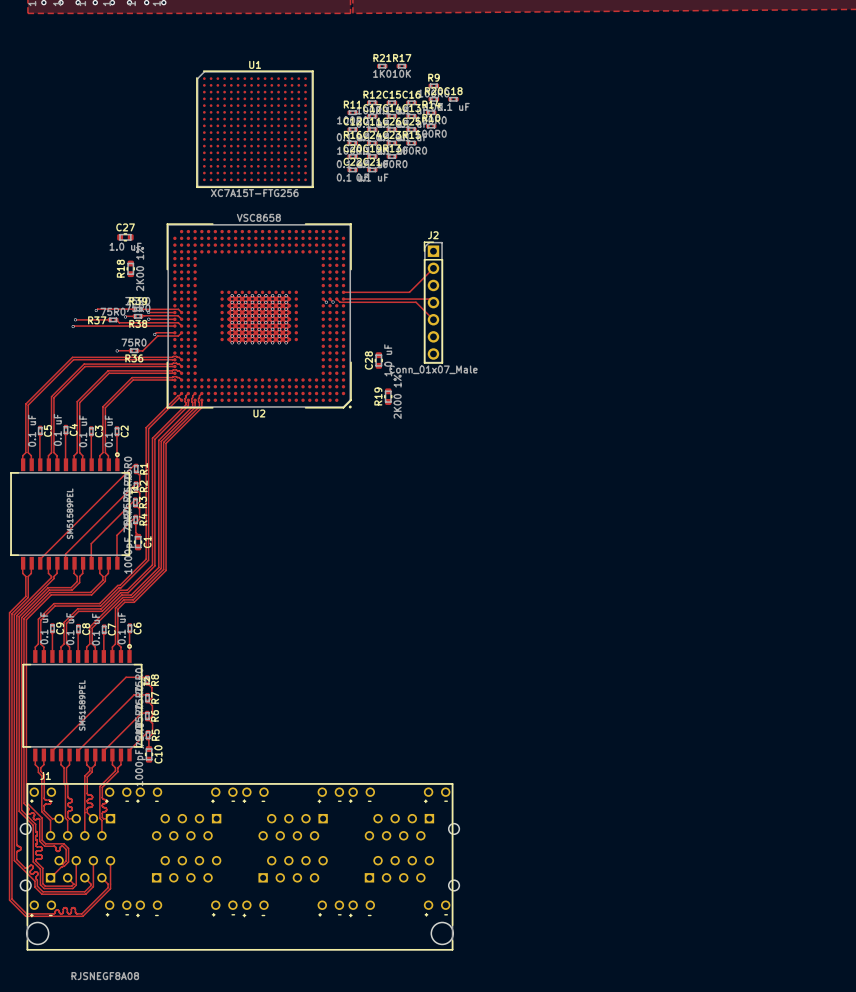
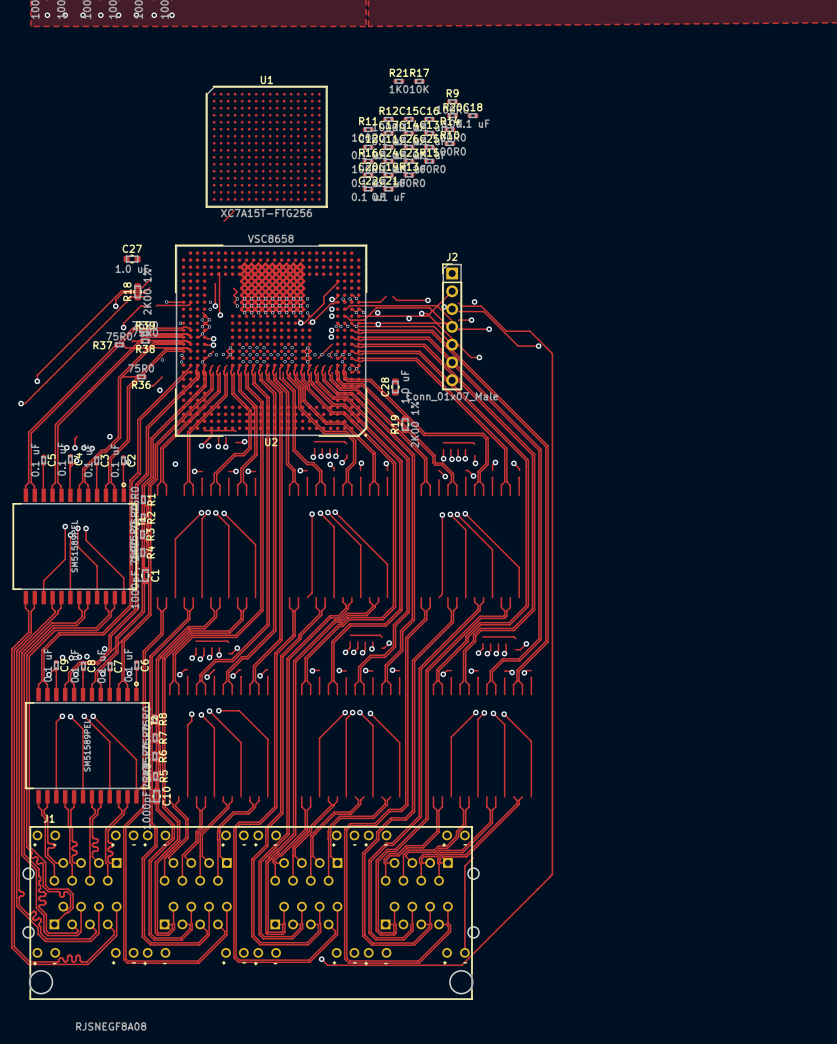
track: none -> (234, 211) (223, 221)
track: none -> (279, 263) (241, 302) (251, 312) (300, 263) (304, 267)
track: none -> (219, 272) (220, 315)
track: none -> (149, 280) (139, 290) (121, 290) (37, 375) (37, 381)
track: none -> (339, 281) (323, 296) (323, 303) (304, 322) (300, 322)
track: none -> (215, 283) (215, 306)
track: none -> (149, 287) (144, 292) (122, 292) (115, 299) (115, 306)
track: none -> (234, 288) (237, 291) (234, 295) (237, 298) (234, 302)
track: none -> (339, 295) (335, 299) (332, 299)
track: none -> (353, 295) (356, 298)
track: none -> (149, 296) (131, 296) (25, 403) (21, 403)
track: none -> (386, 296) (380, 302) (360, 302)
track: none -> (392, 296) (396, 300) (427, 300)
via: none -> (237, 298)
via: none -> (244, 298)
via: none -> (251, 298)
via: none -> (258, 298)
via: none -> (265, 298)
via: none -> (272, 298)
via: none -> (279, 298)
via: none -> (286, 298)
via: none -> (293, 298)
via: none -> (300, 298)
via: none -> (307, 298)
track: none -> (343, 299) (346, 302)
via: none -> (343, 299)
track: none -> (349, 298) (353, 302)
via: none -> (349, 298)
via: none -> (356, 298)
via: none -> (332, 299)
via: none -> (427, 300)
track: none -> (166, 301) (185, 302)
via: none -> (166, 301)
track: none -> (192, 302) (188, 305) (156, 306)
via: none -> (210, 302)
track: none -> (234, 302) (237, 305)
track: none -> (339, 302) (331, 303) (312, 322)
via: none -> (474, 301)
track: none -> (458, 303) (461, 306) (481, 306) (506, 331) (530, 331) (552, 353) (552, 874) (461, 965) (327, 965) (321, 959)
via: none -> (115, 306)
track: none -> (149, 306) (140, 306) (123, 323) (123, 327)
via: none -> (215, 306)
via: none -> (237, 306)
via: none -> (244, 305)
via: none -> (251, 305)
via: none -> (258, 305)
via: none -> (265, 305)
via: none -> (272, 305)
via: none -> (279, 305)
via: none -> (286, 305)
via: none -> (293, 305)
via: none -> (300, 305)
via: none -> (307, 305)
via: none -> (444, 306)
via: none -> (210, 309)
track: none -> (241, 309) (244, 312) (293, 263) (304, 274) (265, 312)
via: none -> (331, 309)
track: none -> (346, 309) (349, 305) (437, 305) (451, 320)
track: none -> (353, 309) (356, 312) (359, 309) (363, 312)
track: none -> (458, 311) (483, 311) (518, 346) (538, 346)
via: none -> (244, 312)
via: none -> (251, 312)
via: none -> (258, 312)
via: none -> (265, 312)
via: none -> (272, 312)
via: none -> (279, 312)
via: none -> (286, 312)
via: none -> (293, 312)
via: none -> (300, 312)
via: none -> (356, 312)
via: none -> (363, 312)
track: none -> (202, 312) (209, 319) (206, 323) (209, 326) (199, 337)
via: none -> (307, 312)
via: none -> (377, 312)
track: none -> (421, 313) (427, 313) (471, 357) (479, 357)
via: none -> (421, 313)
via: none -> (220, 315)
via: none -> (331, 316)
track: none -> (346, 316) (350, 320) (364, 320) (376, 307) (429, 307) (451, 330)
via: none -> (409, 318)
via: none -> (202, 319)
via: none -> (209, 319)
track: (232, 295) (279, 342) (289, 332) -> (244, 263) (293, 312) (304, 302)
track: (232, 295) (228, 299) (272, 342) (289, 326) -> (244, 263) (241, 267) (286, 312) (304, 295)
via: (232, 295) -> none
track: (238, 295) (286, 342) -> (251, 263) (300, 312)
track: (238, 295) (228, 305) (265, 342) -> (251, 263) (241, 274) (279, 312)
via: (238, 295) -> none
via: (245, 295) -> none
via: (252, 295) -> none
via: (259, 295) -> none
track: (265, 295) (289, 319) (265, 342) -> (279, 263) (304, 288) (279, 312)
via: (265, 295) -> none
via: (272, 295) -> none
track: (279, 295) (232, 342) (228, 339) -> none
track: (279, 295) (289, 305) (252, 342) -> none
via: (279, 295) -> none
track: (286, 295) (238, 342) (228, 332) (265, 295) -> none
via: (286, 295) -> none
track: none -> (471, 320) (458, 320)
via: none -> (471, 320)
via: none -> (312, 322)
via: none -> (300, 322)
via: none -> (180, 323)
track: none -> (205, 323) (202, 326)
track: (289, 299) (245, 342) (228, 326) -> (304, 267) (258, 312) (241, 295)
via: none -> (378, 324)
via: none -> (202, 326)
via: none -> (209, 326)
via: (232, 302) -> none
via: (238, 302) -> none
via: (245, 302) -> none
via: (252, 302) -> none
via: (259, 302) -> none
via: (265, 302) -> none
via: (272, 302) -> none
via: (279, 302) -> none
via: (286, 302) -> none
via: none -> (336, 326)
via: none -> (356, 326)
via: none -> (123, 327)
track: none -> (489, 329) (458, 330)
via: none -> (489, 329)
track: none -> (353, 330) (358, 333) (431, 332) (545, 446) (545, 641) (516, 670) (516, 681) (513, 684) (513, 694)
track: none -> (360, 330) (432, 330) (548, 445) (548, 642) (519, 671) (522, 694)
via: none -> (331, 330)
track: (134, 309) (96, 310) -> none
via: none -> (202, 333)
via: (232, 309) -> none
via: (238, 309) -> none
via: (245, 309) -> none
via: (252, 309) -> none
via: (259, 309) -> none
via: (265, 309) -> none
via: (272, 309) -> none
via: (279, 309) -> none
via: (286, 309) -> none
via: (96, 310) -> none
via: (148, 312) -> none
track: none -> (206, 337) (213, 338)
track: (228, 312) (245, 295) (289, 339) (286, 342) -> (241, 281) (258, 263) (304, 309) (300, 312)
track: (228, 312) (259, 342) (289, 312) -> (241, 281) (272, 312) (304, 281)
track: (289, 312) (272, 295) (228, 339) -> (304, 281) (286, 263) (241, 309)
via: none -> (331, 337)
track: none -> (353, 337) (358, 340) (428, 339) (539, 450) (539, 638) (518, 658) (502, 658) (490, 671) (486, 694)
track: none -> (360, 337) (429, 337) (541, 449) (541, 639) (519, 660) (503, 660) (492, 672) (495, 694)
via: none -> (213, 338)
via: (232, 315) -> none
via: (238, 315) -> none
via: (245, 315) -> none
via: (252, 315) -> none
via: (259, 315) -> none
via: (265, 315) -> none
via: (272, 315) -> none
via: (279, 315) -> none
via: (286, 315) -> none
via: (125, 316) -> none
track: (75, 319) (109, 319) -> none
via: (75, 319) -> none
via: (148, 319) -> none
track: none -> (185, 344) (154, 344) (120, 378) (120, 437) (84, 470) (84, 481) (88, 485) (88, 495)
track: none -> (192, 344) (186, 341) (153, 342) (118, 377) (118, 436) (82, 469) (82, 481) (79, 485) (79, 495)
track: none -> (206, 344) (213, 345)
track: (228, 319) (252, 295) (289, 332) -> (241, 288) (265, 263) (304, 302)
track: (228, 319) (252, 342) -> (241, 288) (265, 312)
track: none -> (332, 344) (318, 358)
track: none -> (353, 344) (358, 347) (423, 346) (532, 455) (532, 609) (513, 628) (480, 628) (473, 635) (473, 640) (463, 650) (463, 681) (460, 684) (460, 694)
track: none -> (360, 344) (424, 344) (534, 454) (534, 609) (514, 630) (481, 630) (475, 636) (475, 641) (465, 651) (465, 681) (469, 684) (469, 694)
via: none -> (213, 345)
via: none -> (538, 346)
via: none -> (230, 347)
via: (259, 322) -> none
via: (265, 322) -> none
via: (286, 322) -> none
via: none -> (307, 347)
track: (228, 325) (259, 295) (289, 326) -> (241, 295) (272, 263) (304, 295)
via: (73, 326) -> none
track: (174, 326) (73, 326) -> none
track: none -> (213, 351) (202, 361)
track: none -> (233, 351) (230, 347) (227, 351) (234, 358)
track: none -> (234, 351) (227, 358)
track: none -> (304, 351) (307, 347) (311, 351)
track: none -> (304, 351) (311, 358)
track: none -> (311, 351) (304, 358) (307, 361) (311, 358)
track: none -> (332, 351) (328, 354) (332, 358)
track: none -> (346, 351) (339, 358)
track: none -> (353, 351) (358, 354) (418, 353) (526, 460) (526, 605) (509, 622) (479, 622) (465, 636) (465, 640) (436, 669) (436, 681) (433, 684) (433, 694)
track: none -> (360, 351) (419, 351) (528, 459) (528, 606) (509, 624) (480, 624) (467, 637) (467, 641) (438, 670) (442, 694)
via: none -> (209, 354)
via: none -> (216, 354)
via: none -> (223, 354)
via: none -> (230, 354)
via: (286, 329) -> none
via: none -> (307, 354)
via: none -> (314, 354)
via: none -> (321, 354)
via: none -> (328, 354)
via: none -> (335, 354)
via: none -> (342, 354)
via: none -> (349, 354)
via: none -> (181, 355)
track: (174, 332) (156, 332) (154, 334) -> none
track: (181, 332) (178, 336) (157, 336) (142, 350) (137, 350) -> none
track: none -> (353, 358) (358, 361) (415, 360) (504, 449) (504, 481) (501, 485) (501, 495)
track: none -> (360, 358) (416, 358) (506, 448) (506, 481) (510, 485) (510, 495)
via: none -> (479, 357)
via: none -> (181, 361)
via: none -> (202, 361)
via: (259, 336) -> none
via: (265, 336) -> none
via: (286, 336) -> none
via: none -> (307, 361)
via: none -> (342, 361)
track: none -> (220, 365) (216, 370) (217, 391) (160, 448) (160, 481) (157, 485) (157, 495)
track: none -> (227, 365) (223, 370) (224, 394) (187, 432) (187, 481) (184, 485) (184, 495)
track: none -> (234, 365) (230, 370) (231, 394) (248, 411) (248, 447) (242, 453) (234, 453) (214, 473) (211, 495)
track: none -> (241, 365) (237, 370) (238, 391) (254, 407) (254, 454) (240, 468) (240, 481) (237, 485) (237, 495)
track: none -> (248, 365) (244, 370) (246, 387) (260, 402) (260, 609) (235, 635) (191, 635) (173, 653) (173, 681) (169, 684) (169, 694)
track: none -> (255, 365) (251, 370) (253, 384) (267, 398) (267, 624) (231, 659) (215, 659) (199, 674) (199, 681) (196, 684) (196, 694)
track: none -> (262, 365) (258, 370) (260, 380) (273, 394) (273, 630) (247, 656) (241, 656) (226, 671) (223, 694)
track: none -> (269, 365) (265, 370) (267, 379) (279, 392) (279, 639) (253, 665) (253, 681) (249, 684) (249, 694)
track: none -> (276, 365) (273, 370) (274, 380) (286, 392) (286, 464) (292, 470) (292, 481) (289, 485) (289, 495)
track: none -> (283, 365) (280, 368) (280, 378) (293, 391) (293, 450) (307, 464) (312, 464) (319, 471) (316, 495)
track: none -> (290, 365) (287, 373) (288, 378) (298, 389) (298, 408) (323, 433) (345, 433) (353, 441) (353, 462) (346, 469) (346, 481) (342, 485) (342, 495)
track: none -> (297, 365) (294, 373) (295, 379) (303, 387) (303, 401) (325, 424) (343, 424) (373, 453) (373, 481) (369, 485) (369, 495)
track: none -> (304, 365) (301, 373) (302, 380) (307, 385) (307, 389) (331, 414) (343, 414) (393, 463) (393, 606) (381, 617) (348, 617) (341, 624) (338, 624) (305, 658) (305, 681) (301, 684) (301, 694)
track: none -> (311, 365) (308, 373) (311, 384) (333, 406) (344, 406) (399, 462) (399, 609) (385, 623) (349, 623) (331, 641) (331, 681) (328, 684) (328, 694)
track: none -> (318, 365) (315, 370) (316, 382) (333, 399) (346, 399) (406, 459) (406, 611) (393, 625) (393, 646) (384, 655) (370, 655) (358, 667) (358, 681) (355, 684) (355, 694)
track: none -> (325, 365) (322, 370) (323, 380) (337, 394) (351, 394) (412, 455) (412, 619) (400, 630) (400, 650) (385, 665) (385, 681) (381, 684) (381, 694)
track: none -> (332, 365) (329, 370) (330, 380) (340, 390) (355, 390) (424, 459) (424, 481) (421, 485) (421, 495)
track: none -> (339, 365) (336, 370) (337, 380) (342, 385) (362, 385) (432, 456) (432, 462) (435, 465) (441, 465) (451, 474) (451, 481) (447, 485) (447, 495)
track: none -> (346, 365) (343, 373) (347, 381) (370, 381) (424, 435) (482, 435) (485, 439) (485, 463) (478, 471) (474, 495)
track: none -> (353, 365) (356, 368)
track: none -> (360, 365) (353, 372)
via: (232, 342) -> none
via: (238, 342) -> none
via: (245, 342) -> none
via: (252, 342) -> none
via: (259, 342) -> none
via: (265, 342) -> none
via: (272, 342) -> none
via: (279, 342) -> none
via: (286, 342) -> none
via: none -> (349, 368)
via: none -> (356, 368)
track: none -> (199, 372) (199, 377) (148, 428) (148, 474) (137, 485) (137, 609) (111, 636) (111, 651)
track: none -> (220, 372) (220, 391) (163, 448) (163, 481) (166, 485) (166, 495)
track: none -> (227, 372) (227, 395) (189, 433) (189, 481) (193, 485) (193, 495)
track: none -> (234, 372) (234, 393) (251, 410) (251, 448) (243, 455) (235, 455) (216, 474) (216, 481) (219, 485) (219, 495)
track: none -> (241, 372) (241, 390) (256, 406) (256, 455) (243, 468) (243, 481) (246, 485) (246, 495)
track: none -> (248, 372) (248, 386) (262, 401) (262, 610) (236, 637) (192, 637) (175, 654) (175, 681) (178, 684) (178, 694)
track: none -> (255, 372) (255, 383) (269, 397) (269, 625) (232, 661) (216, 661) (202, 675) (202, 681) (205, 684) (205, 694)
track: none -> (262, 372) (262, 379) (275, 393) (275, 630) (247, 658) (242, 658) (228, 672) (228, 681) (232, 684) (232, 694)
track: none -> (269, 372) (269, 379) (282, 391) (282, 640) (255, 666) (255, 681) (258, 684) (258, 694)
track: none -> (276, 372) (276, 379) (288, 392) (288, 463) (295, 469) (295, 481) (298, 485) (298, 495)
track: none -> (283, 372) (283, 378) (295, 390) (295, 449) (307, 462) (313, 462) (321, 470) (321, 481) (325, 485) (325, 495)
track: none -> (290, 372) (290, 377) (300, 388) (300, 407) (324, 431) (346, 431) (355, 440) (355, 462) (348, 470) (348, 481) (351, 485) (351, 495)
track: none -> (297, 372) (297, 378) (305, 386) (305, 400) (326, 421) (344, 421) (375, 453) (375, 481) (378, 485) (378, 495)
track: none -> (304, 372) (304, 379) (309, 384) (309, 388) (332, 411) (344, 411) (395, 462) (395, 607) (382, 619) (349, 619) (342, 626) (339, 626) (307, 658) (307, 681) (310, 684) (310, 694)
track: none -> (311, 372) (311, 380) (333, 404) (344, 404) (401, 461) (401, 610) (386, 626) (350, 626) (333, 642) (333, 681) (337, 684) (337, 694)
track: none -> (318, 372) (318, 381) (333, 397) (347, 397) (409, 458) (409, 612) (395, 625) (395, 646) (385, 657) (371, 657) (360, 667) (360, 681) (364, 684) (364, 694)
track: none -> (325, 372) (325, 379) (337, 392) (352, 392) (414, 454) (414, 620) (402, 631) (402, 651) (387, 666) (387, 681) (390, 684) (390, 694)
track: none -> (332, 372) (332, 379) (340, 388) (356, 388) (426, 458) (426, 481) (430, 485) (430, 495)
track: none -> (339, 372) (339, 379) (343, 383) (363, 383) (435, 455) (436, 463) (442, 463) (453, 473) (453, 481) (456, 485) (456, 495)
track: none -> (346, 372) (348, 379) (371, 379) (425, 433) (483, 433) (488, 438) (488, 464) (480, 472) (483, 495)
via: (117, 350) -> none
track: none -> (162, 376) (153, 385) (150, 385)
via: none -> (37, 381)
track: (72, 357) (176, 356) (181, 359) -> (77, 383) (132, 328) (186, 327) (192, 330)
track: (73, 359) (174, 359) -> (78, 386) (134, 330) (185, 330)
via: none -> (159, 390)
track: (84, 364) (176, 363) (181, 366) -> (89, 390) (145, 335) (186, 334) (192, 337)
track: (85, 366) (174, 366) -> (90, 393) (146, 337) (185, 337)
track: (174, 373) (109, 373) (79, 402) (79, 452) (82, 455) (82, 465) -> none
track: (181, 373) (176, 369) (108, 370) (77, 401) (77, 452) (74, 455) (74, 465) -> none
via: none -> (21, 403)
track: (174, 380) (133, 380) (105, 407) (105, 430) -> (185, 351) (166, 351) (129, 388) (129, 441) (111, 459)
track: (181, 380) (176, 376) (132, 377) (102, 406) (102, 429) -> (192, 351) (186, 348) (165, 349) (127, 387) (127, 440) (108, 458)
track: (181, 393) (146, 427) (146, 559) (99, 603) (53, 603) (38, 619) (38, 643) (35, 647) -> (192, 365) (137, 419) (137, 472) (130, 480) (130, 605) (102, 632) (59, 632) (41, 650) (41, 681) (38, 684)
track: (188, 393) (185, 398) (185, 404) (152, 438) (152, 564) (127, 590) (119, 590) (101, 608) (77, 608) (64, 622) (64, 643) (61, 647) -> (199, 365) (195, 370) (196, 376) (146, 427) (146, 473) (135, 484) (135, 608) (109, 635) (109, 650) (97, 661) (79, 661) (68, 672) (68, 681) (65, 684)
track: (195, 393) (191, 398) (192, 406) (158, 440) (158, 567) (131, 595) (121, 595) (89, 627) (89, 643) (86, 647) -> (206, 365) (202, 370) (203, 385) (151, 438) (151, 476) (142, 485) (142, 611) (115, 637) (115, 651) (95, 672) (95, 681) (91, 684)
track: (201, 393) (198, 398) (199, 406) (163, 442) (163, 569) (133, 599) (123, 599) (115, 608) (115, 643) (112, 647) -> (213, 365) (209, 370) (210, 388) (155, 444) (155, 478) (148, 484) (148, 614) (122, 640) (122, 681) (118, 684)
track: (181, 400) (179, 398) (148, 428) (148, 560) (100, 606) (54, 606) (40, 620) (40, 643) (43, 647) -> (192, 372) (188, 372) (140, 420) (140, 473) (132, 481) (132, 606) (103, 634) (59, 634) (44, 650) (44, 681) (47, 684)
track: (188, 400) (188, 405) (154, 439) (154, 565) (128, 592) (120, 592) (102, 611) (78, 611) (66, 623) (66, 643) (69, 647) -> (98, 663) (80, 663) (70, 673) (70, 681) (74, 684)
track: (195, 400) (195, 407) (161, 441) (161, 568) (132, 597) (122, 597) -> none
track: none -> (204, 430) (235, 431)
track: (201, 407) (166, 443) (166, 570) (134, 602) (124, 602) (117, 609) (117, 643) (120, 647) -> (213, 372) (213, 389) (157, 445) (157, 479) (150, 485) (150, 615) (124, 641) (124, 681) (127, 684)
track: none -> (77, 436) (75, 438) (75, 447)
via: none -> (109, 436)
track: none -> (218, 437) (218, 446)
track: none -> (225, 437) (225, 447)
track: none -> (244, 441) (235, 442)
via: none -> (244, 441)
track: none -> (314, 441) (344, 441) (346, 443)
track: none -> (443, 442) (473, 442) (474, 444)
via: none -> (201, 445)
via: none -> (208, 445)
via: none -> (218, 446)
via: none -> (66, 447)
via: none -> (225, 447)
via: none -> (75, 447)
via: none -> (83, 447)
via: none -> (92, 448)
track: none -> (314, 448) (313, 457)
track: none -> (322, 448) (320, 456)
track: none -> (329, 448) (328, 455)
track: none -> (337, 448) (335, 456)
track: none -> (443, 449) (443, 458)
track: none -> (450, 449) (451, 459)
track: none -> (458, 449) (458, 458)
track: none -> (465, 449) (465, 458)
track: none -> (346, 454) (346, 457) (342, 462)
via: none -> (328, 455)
track: none -> (474, 455) (475, 463)
via: none -> (320, 456)
via: none -> (335, 456)
via: none -> (313, 457)
via: none -> (443, 458)
via: none -> (458, 458)
via: none -> (465, 458)
via: none -> (451, 459)
track: none -> (76, 460) (70, 466) (70, 470)
via: none -> (76, 460)
via: none -> (128, 462)
via: none -> (342, 462)
track: none -> (361, 463) (360, 470)
via: none -> (361, 463)
track: none -> (495, 462) (492, 465) (492, 470)
via: none -> (495, 462)
via: none -> (175, 464)
track: none -> (386, 463) (387, 470)
via: none -> (386, 463)
via: none -> (475, 463)
track: none -> (513, 463) (519, 470)
via: none -> (513, 463)
track: none -> (330, 464) (334, 470)
via: none -> (330, 464)
track: none -> (439, 470) (445, 476)
track: none -> (465, 470) (473, 476)
track: none -> (194, 471) (202, 471)
via: none -> (194, 471)
track: none -> (236, 471) (228, 471)
via: none -> (236, 471)
track: none -> (248, 471) (255, 471)
via: none -> (248, 471)
track: none -> (300, 470) (307, 470)
via: none -> (300, 470)
via: none -> (445, 476)
via: none -> (473, 476)
track: none -> (307, 477) (307, 495)
track: none -> (334, 477) (334, 495)
track: none -> (360, 477) (360, 495)
track: none -> (387, 477) (387, 495)
track: none -> (465, 477) (465, 495)
track: none -> (492, 477) (492, 495)
track: none -> (519, 477) (519, 495)
track: none -> (202, 478) (202, 495)
track: none -> (228, 478) (228, 495)
track: none -> (255, 478) (255, 495)
track: none -> (439, 479) (439, 495)
track: (136, 465) (39, 559) -> none
track: none -> (335, 512) (387, 564) (387, 597)
via: none -> (335, 512)
track: none -> (201, 512) (175, 539) (175, 597)
via: none -> (201, 512)
track: none -> (208, 512) (202, 518) (202, 597)
via: none -> (208, 512)
track: none -> (215, 512) (228, 525) (228, 597)
via: none -> (215, 512)
track: none -> (320, 513) (334, 526) (334, 597)
via: none -> (320, 513)
track: none -> (327, 512) (360, 545) (360, 597)
via: none -> (327, 512)
track: (136, 482) (65, 554) (65, 563) -> none
track: none -> (224, 513) (255, 544) (255, 597)
via: none -> (224, 513)
track: none -> (312, 514) (312, 592) (307, 597)
via: none -> (312, 514)
track: none -> (465, 513) (519, 567) (519, 597)
via: none -> (465, 513)
track: none -> (442, 515) (442, 594) (439, 597)
via: none -> (442, 515)
track: none -> (450, 514) (465, 529) (465, 597)
via: none -> (450, 514)
track: none -> (457, 514) (492, 549) (492, 597)
via: none -> (457, 514)
track: none -> (65, 526) (65, 559) (43, 580) (43, 597) (43, 593)
via: none -> (65, 526)
track: none -> (77, 528) (77, 546) (97, 565) (97, 597)
via: none -> (77, 528)
track: none -> (86, 528) (86, 540) (123, 578) (123, 597)
via: none -> (86, 528)
track: (136, 498) (91, 543) (91, 563) -> none
track: none -> (70, 535) (70, 597)
via: none -> (70, 535)
track: (135, 516) (116, 535) (116, 563) -> none
track: none -> (157, 597) (157, 607) (160, 611) (160, 633) (143, 651) (143, 806) (123, 826) (123, 959) (127, 963) (198, 963) (226, 935) (226, 906)
track: none -> (166, 597) (166, 607) (163, 611) (163, 634) (145, 652) (145, 807) (125, 827) (125, 958) (128, 961) (198, 961) (224, 934) (224, 931) (217, 924)
track: none -> (184, 597) (184, 607) (187, 611) (187, 618) (149, 656) (149, 823) (154, 828) (154, 845) (142, 858) (142, 936) (150, 945) (199, 945) (209, 935) (209, 906)
track: none -> (193, 597) (193, 607) (189, 611) (189, 619) (152, 657) (152, 822) (157, 827) (157, 846) (144, 859) (144, 936) (151, 942) (198, 942) (206, 934) (206, 931) (200, 924)
track: none -> (211, 597) (211, 607) (214, 611) (214, 616) (204, 626) (188, 626) (156, 659) (156, 810) (172, 826) (172, 837) (149, 860) (149, 934) (154, 940) (181, 940) (192, 929) (191, 906)
track: none -> (219, 597) (219, 607) (216, 611) (216, 617) (205, 628) (188, 628) (158, 660) (158, 809) (174, 825) (174, 838) (151, 861) (151, 933) (155, 937) (181, 937) (189, 928) (189, 924) (182, 924)
track: none -> (237, 597) (237, 607) (241, 611) (241, 618) (228, 630) (189, 630) (162, 658) (162, 807) (177, 822) (177, 839) (155, 862) (155, 933) (157, 935) (168, 935) (174, 929) (173, 906)
track: none -> (246, 597) (246, 607) (243, 611) (243, 619) (229, 633) (190, 633) (164, 658) (164, 806) (179, 821) (179, 840) (157, 863) (158, 933) (167, 933) (172, 928) (171, 924) (164, 924)
track: none -> (289, 597) (289, 607) (292, 610) (292, 635) (274, 653) (274, 806) (259, 822) (239, 822) (233, 827) (233, 957) (238, 962) (309, 962) (337, 934) (337, 906)
track: none -> (298, 597) (298, 607) (295, 610) (295, 636) (276, 654) (276, 807) (260, 824) (239, 824) (236, 828) (236, 956) (239, 960) (308, 960) (335, 933) (328, 924)
track: none -> (316, 597) (316, 607) (319, 614) (280, 656) (280, 812) (265, 827) (265, 845) (251, 859) (251, 936) (260, 944) (308, 944) (320, 932) (319, 906)
track: none -> (325, 597) (325, 607) (321, 610) (321, 615) (282, 656) (282, 813) (267, 828) (267, 846) (253, 860) (253, 935) (260, 942) (307, 942) (318, 931) (318, 924) (310, 924)
track: none -> (342, 597) (346, 607) (338, 615) (329, 615) (286, 658) (286, 833) (259, 861) (259, 934) (263, 938) (292, 938) (302, 928) (301, 906)
track: none -> (351, 597) (348, 608) (339, 617) (330, 617) (289, 659) (289, 834) (261, 862) (261, 933) (264, 936) (291, 936) (300, 927) (300, 924) (293, 924)
track: none -> (369, 597) (369, 601) (373, 606) (365, 613) (346, 613) (340, 619) (334, 619) (293, 661) (293, 833) (265, 861) (267, 934) (282, 934) (284, 932) (284, 906)
track: none -> (378, 597) (375, 607) (366, 615) (347, 615) (340, 622) (335, 622) (295, 662) (295, 834) (268, 862) (268, 932)
track: none -> (421, 597) (421, 607) (424, 610) (424, 618) (405, 637) (405, 804) (400, 809) (389, 809) (374, 823) (350, 823) (344, 829) (344, 958) (348, 963) (419, 963) (450, 931) (450, 925) (447, 922) (447, 906)
track: none -> (430, 597) (430, 607) (426, 610) (426, 619) (407, 638) (407, 805) (401, 811) (389, 811) (375, 825) (351, 825) (346, 830) (346, 958) (349, 961) (418, 961) (448, 931) (446, 924) (439, 924)
track: none -> (447, 597) (451, 621) (412, 660) (412, 810) (405, 817) (390, 817) (376, 832) (376, 839) (362, 853) (362, 935) (371, 945) (414, 945) (431, 927) (430, 906)
track: none -> (456, 597) (456, 607) (453, 610) (453, 622) (414, 661) (414, 811) (406, 820) (391, 820) (378, 832) (378, 839) (364, 853) (364, 934) (372, 943) (413, 943) (429, 926) (428, 924) (421, 924)
track: none -> (474, 597) (478, 609) (419, 668) (419, 816) (392, 843) (386, 843) (369, 860) (369, 933) (375, 939) (404, 939) (413, 930) (412, 906)
track: none -> (483, 597) (480, 610) (421, 669) (421, 817) (393, 845) (386, 845) (371, 861) (371, 932) (376, 937) (403, 937) (410, 929) (410, 924)
track: none -> (501, 597) (501, 607) (504, 610) (503, 616) (480, 616) (425, 670) (425, 818) (395, 849) (387, 849) (376, 860) (376, 930) (380, 935) (394, 935) (396, 933) (394, 906)
track: none -> (510, 597) (510, 607) (504, 618) (480, 618) (428, 671) (428, 819) (395, 851) (388, 851) (378, 861) (378, 929) (381, 932) (393, 932) (393, 925) (385, 924)
track: none -> (350, 635) (380, 635) (382, 637)
track: none -> (482, 636) (513, 636) (515, 638)
track: none -> (196, 641) (228, 642)
track: none -> (350, 642) (350, 647) (345, 652)
track: none -> (357, 642) (357, 648) (353, 652)
track: none -> (365, 642) (365, 650) (362, 652)
track: none -> (372, 642) (371, 649)
track: none -> (389, 643) (382, 648)
via: none -> (389, 643)
track: none -> (482, 643) (482, 648) (478, 653)
track: none -> (490, 643) (490, 650) (487, 653)
track: none -> (498, 643) (498, 651) (496, 653)
track: none -> (506, 643) (504, 653)
track: none -> (526, 643) (520, 649) (515, 649)
via: none -> (526, 643)
track: none -> (196, 647) (196, 654) (192, 658)
track: none -> (204, 647) (204, 655) (200, 659)
track: none -> (211, 647) (211, 655) (209, 657)
track: none -> (219, 647) (219, 655)
track: none -> (237, 648) (231, 653) (228, 653)
via: none -> (237, 648)
via: none -> (104, 648)
via: none -> (371, 649)
via: none -> (345, 652)
via: none -> (353, 652)
via: none -> (362, 652)
via: none -> (478, 653)
via: none -> (487, 653)
via: none -> (496, 653)
via: none -> (504, 653)
via: none -> (219, 655)
via: none -> (86, 656)
via: none -> (62, 657)
via: none -> (79, 657)
via: none -> (209, 657)
via: none -> (71, 657)
via: none -> (192, 658)
via: none -> (200, 659)
track: (92, 628) (92, 643) (95, 647) -> (206, 372) (206, 386) (153, 439) (153, 477) (144, 486) (144, 611) (118, 638) (118, 652) (97, 673) (97, 681) (100, 684)
track: none -> (56, 670) (49, 674)
track: none -> (187, 669) (179, 674)
track: none -> (214, 669) (207, 677)
track: none -> (240, 669) (233, 676)
track: none -> (267, 669) (260, 675)
via: none -> (312, 670)
track: none -> (319, 670) (312, 670)
track: none -> (339, 670) (346, 670)
via: none -> (339, 670)
track: none -> (365, 670) (372, 670)
via: none -> (365, 670)
track: none -> (392, 670) (399, 670)
via: none -> (392, 670)
track: none -> (451, 670) (446, 670) (443, 674)
via: none -> (471, 671)
track: none -> (478, 670) (471, 671)
track: none -> (504, 671) (512, 672)
track: none -> (531, 670) (524, 672)
via: none -> (512, 672)
via: none -> (524, 672)
via: none -> (102, 673)
via: none -> (129, 673)
via: none -> (49, 674)
via: none -> (75, 674)
via: none -> (179, 674)
via: none -> (443, 674)
via: none -> (233, 676)
via: none -> (260, 675)
track: none -> (187, 676) (187, 694)
via: none -> (207, 677)
track: none -> (214, 676) (214, 694)
track: none -> (240, 676) (241, 694)
track: none -> (267, 676) (267, 694)
track: none -> (319, 677) (319, 694)
track: none -> (346, 677) (346, 694)
track: none -> (372, 677) (372, 694)
track: none -> (399, 677) (399, 694)
track: none -> (451, 677) (451, 694)
track: none -> (478, 677) (477, 694)
track: none -> (504, 677) (504, 694)
track: none -> (531, 677) (531, 694)
track: none -> (209, 711) (241, 742) (241, 796)
via: none -> (209, 711)
track: none -> (218, 710) (239, 710) (267, 739) (267, 796)
via: none -> (218, 710)
track: none -> (345, 712) (319, 738) (319, 796)
via: none -> (345, 712)
track: none -> (352, 712) (346, 718) (346, 796)
via: none -> (352, 712)
track: none -> (359, 712) (372, 725) (372, 796)
via: none -> (359, 712)
track: none -> (475, 712) (451, 737) (451, 796)
via: none -> (475, 712)
track: none -> (370, 713) (399, 742) (399, 796)
via: none -> (370, 713)
track: none -> (484, 712) (477, 719) (477, 796)
via: none -> (484, 712)
track: none -> (493, 713) (504, 724) (504, 796)
via: none -> (493, 713)
track: none -> (191, 714) (191, 721) (187, 725) (187, 796)
via: none -> (191, 714)
track: none -> (504, 714) (531, 741) (531, 796)
via: none -> (504, 714)
track: none -> (201, 714) (214, 727) (214, 796)
via: none -> (201, 714)
track: none -> (62, 716) (56, 721) (56, 796)
via: none -> (62, 716)
track: none -> (70, 716) (83, 729) (83, 796)
via: none -> (70, 716)
track: none -> (84, 716) (109, 741) (109, 796)
via: none -> (84, 716)
track: none -> (93, 716) (136, 759) (136, 796)
via: none -> (93, 716)
track: (148, 677) (126, 677) (52, 750) -> none
track: (148, 694) (134, 694) (78, 750) -> none
track: (148, 713) (141, 713) (103, 750) -> none
track: none -> (169, 796) (173, 806) (185, 819) (185, 837) (164, 858) (164, 880)
track: none -> (178, 796) (178, 801) (175, 806) (188, 818) (188, 838) (168, 857) (173, 862)
track: none -> (196, 796) (196, 806) (199, 810) (199, 827) (195, 832) (195, 841) (182, 855) (182, 880)
track: none -> (205, 796) (205, 806) (202, 810) (202, 828) (198, 832) (198, 842) (184, 856) (191, 862)
track: none -> (223, 796) (226, 807) (200, 833) (200, 880)
track: none -> (232, 796) (228, 808) (202, 834) (202, 856) (209, 862)
track: none -> (249, 796) (253, 806) (247, 811) (233, 811) (217, 827) (217, 880)
track: none -> (258, 796) (255, 807) (248, 814) (234, 814) (220, 828) (220, 856) (226, 862)
track: none -> (301, 796) (301, 806) (305, 810) (305, 829) (273, 859) (275, 864) (275, 880)
track: none -> (310, 796) (310, 806) (307, 810) (307, 830) (275, 860) (276, 862) (284, 862)
track: none -> (328, 796) (328, 801) (331, 804) (309, 827) (309, 831) (293, 847) (293, 880)
track: none -> (337, 796) (337, 801) (333, 805) (311, 828) (311, 832) (295, 848) (295, 856) (301, 862)
track: none -> (355, 796) (358, 803) (350, 812) (334, 812) (310, 835) (310, 880)
track: none -> (364, 796) (360, 800) (360, 804) (350, 814) (334, 814) (312, 836) (312, 856) (319, 862)
track: none -> (381, 796) (385, 800) (385, 803) (372, 816) (339, 816) (328, 827) (328, 880)
track: none -> (390, 796) (387, 800) (387, 804) (373, 818) (340, 818) (330, 828) (330, 856) (337, 862)
track: none -> (433, 796) (433, 806) (436, 810) (436, 831) (422, 845) (406, 845) (398, 853) (389, 853) (384, 859) (385, 880)
track: none -> (442, 796) (442, 806) (438, 810) (438, 832) (423, 847) (407, 847) (399, 855) (390, 855) (386, 860) (387, 862) (394, 862)
track: none -> (460, 796) (460, 806) (463, 810) (463, 824) (456, 831) (456, 836) (446, 846) (438, 846) (434, 850) (407, 850) (403, 854) (403, 880)
track: none -> (469, 796) (469, 806) (465, 810) (465, 825) (458, 832) (458, 837) (447, 848) (439, 848) (435, 852) (408, 852) (405, 856) (412, 862)
track: none -> (486, 796) (486, 806) (490, 810) (490, 822) (461, 850) (440, 850) (435, 854) (423, 854) (419, 858) (421, 880)
track: none -> (495, 796) (495, 806) (492, 810) (492, 822) (462, 852) (440, 852) (436, 856) (424, 856) (421, 858) (422, 862) (430, 862)
track: none -> (513, 796) (516, 803) (465, 854) (441, 854) (437, 858) (439, 880)
track: none -> (522, 796) (519, 800) (519, 804) (466, 856) (442, 856) (440, 859) (440, 862) (447, 862)
track: none -> (473, 857) (464, 866) (464, 952)
track: none -> (275, 924) (282, 924) (282, 931) (268, 932)
via: none -> (321, 959)

